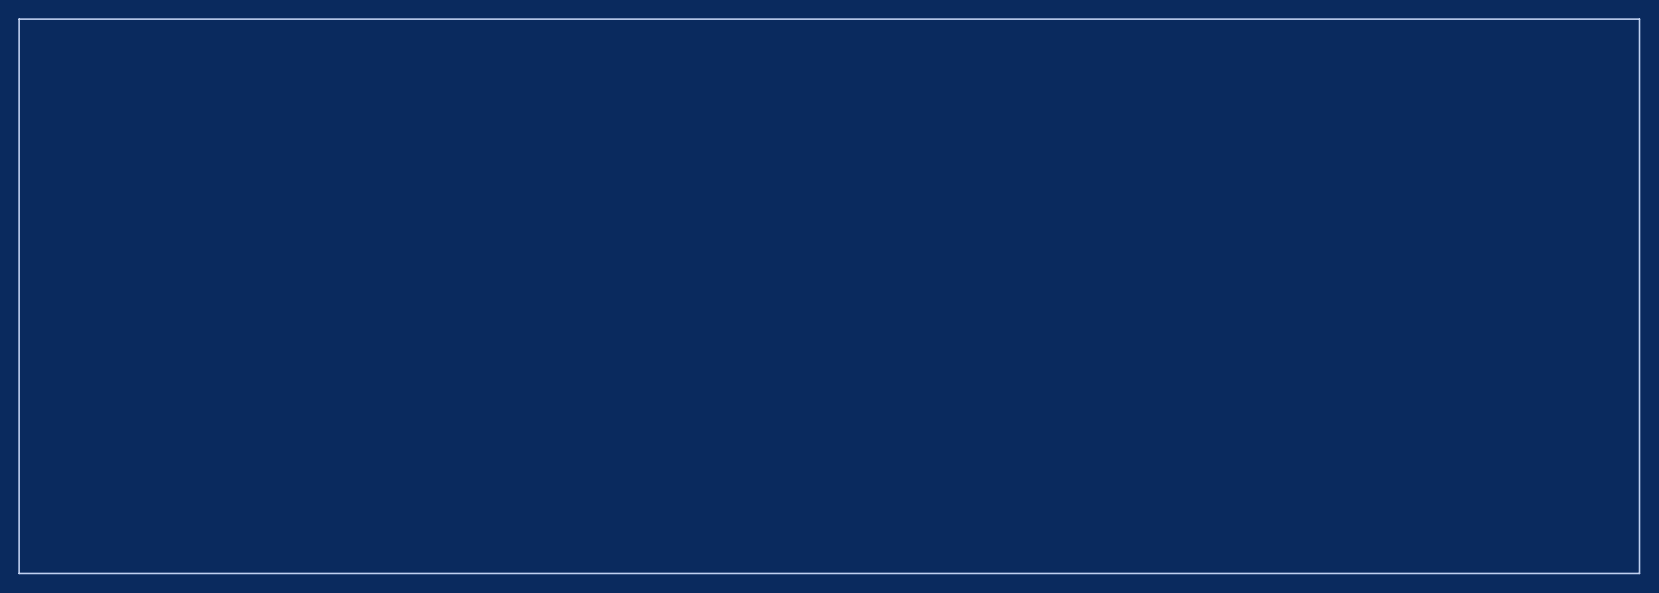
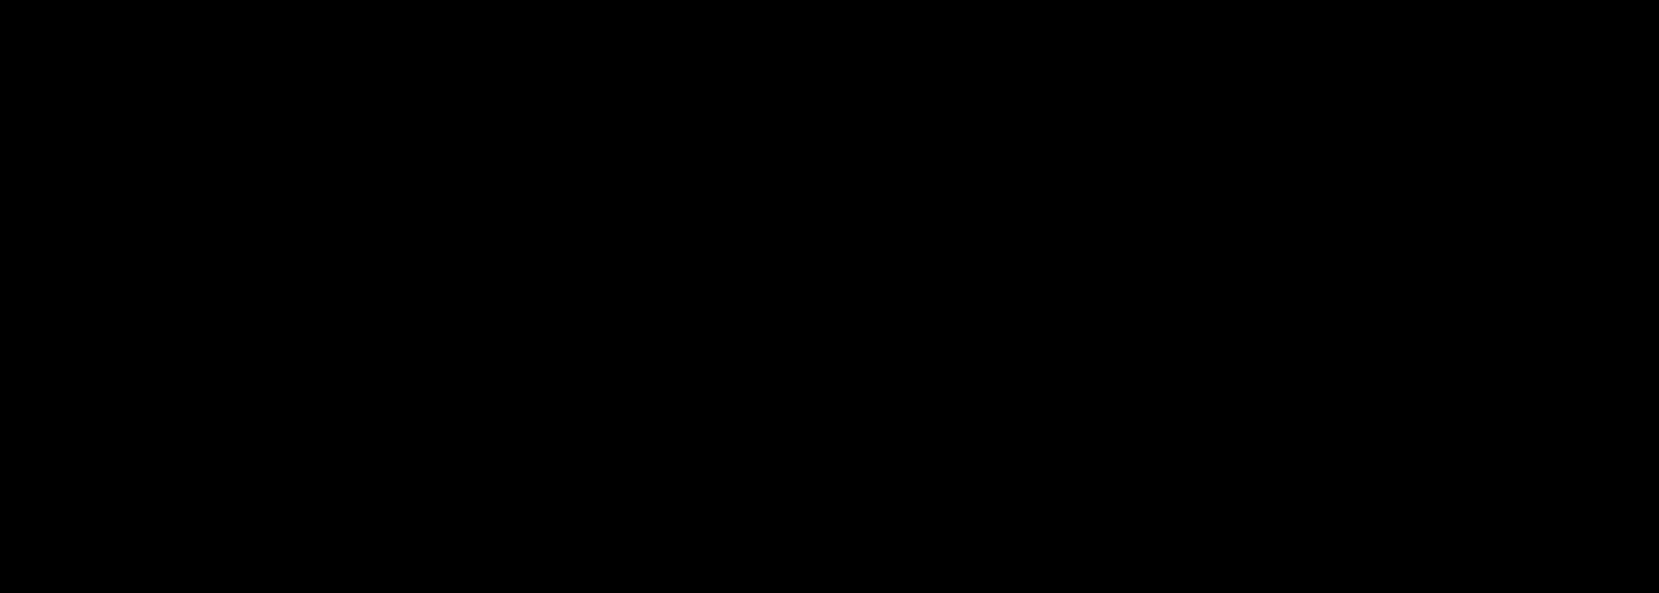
board edge: (19, 19) (1639, 19) (1639, 573) (19, 573) (19, 19) -> none

